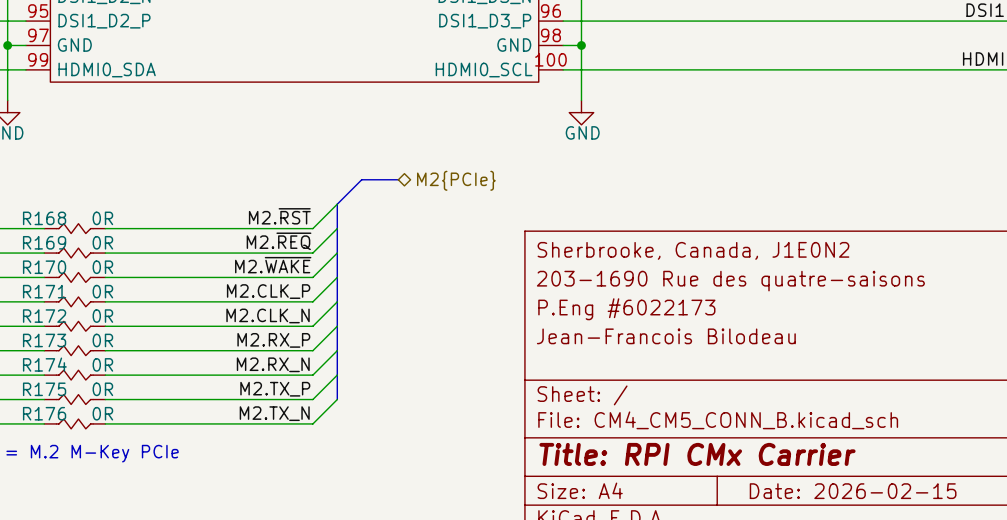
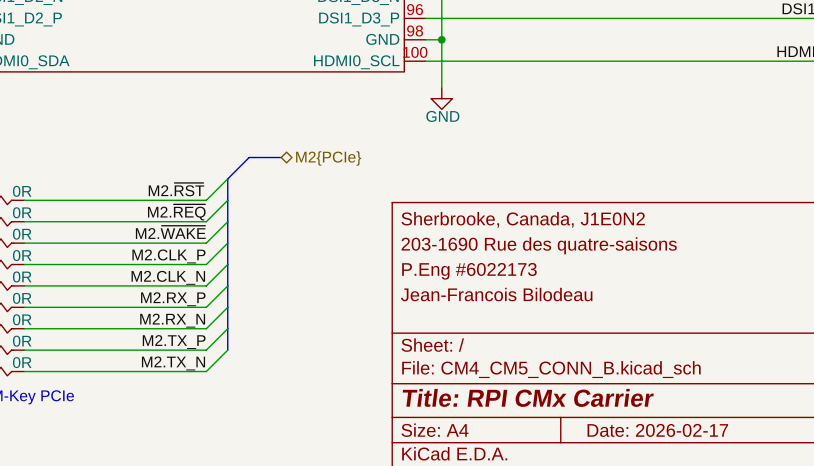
title block: Date: 2026-02-15 (853, 491) -> Date: 2026-02-17 (657, 430)

